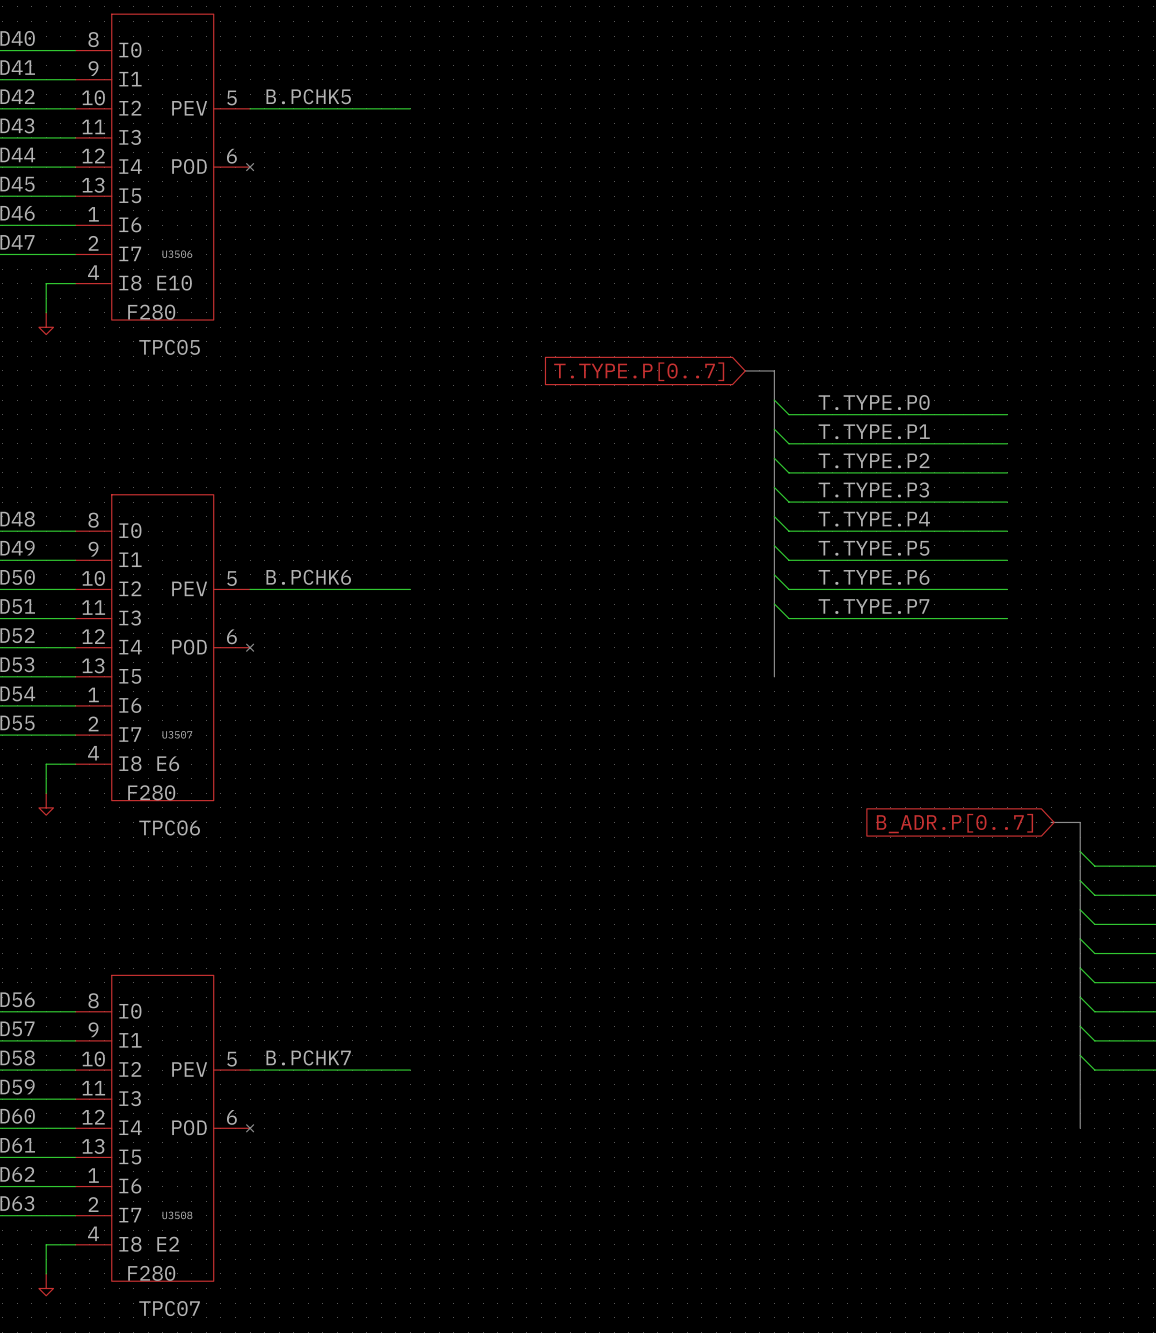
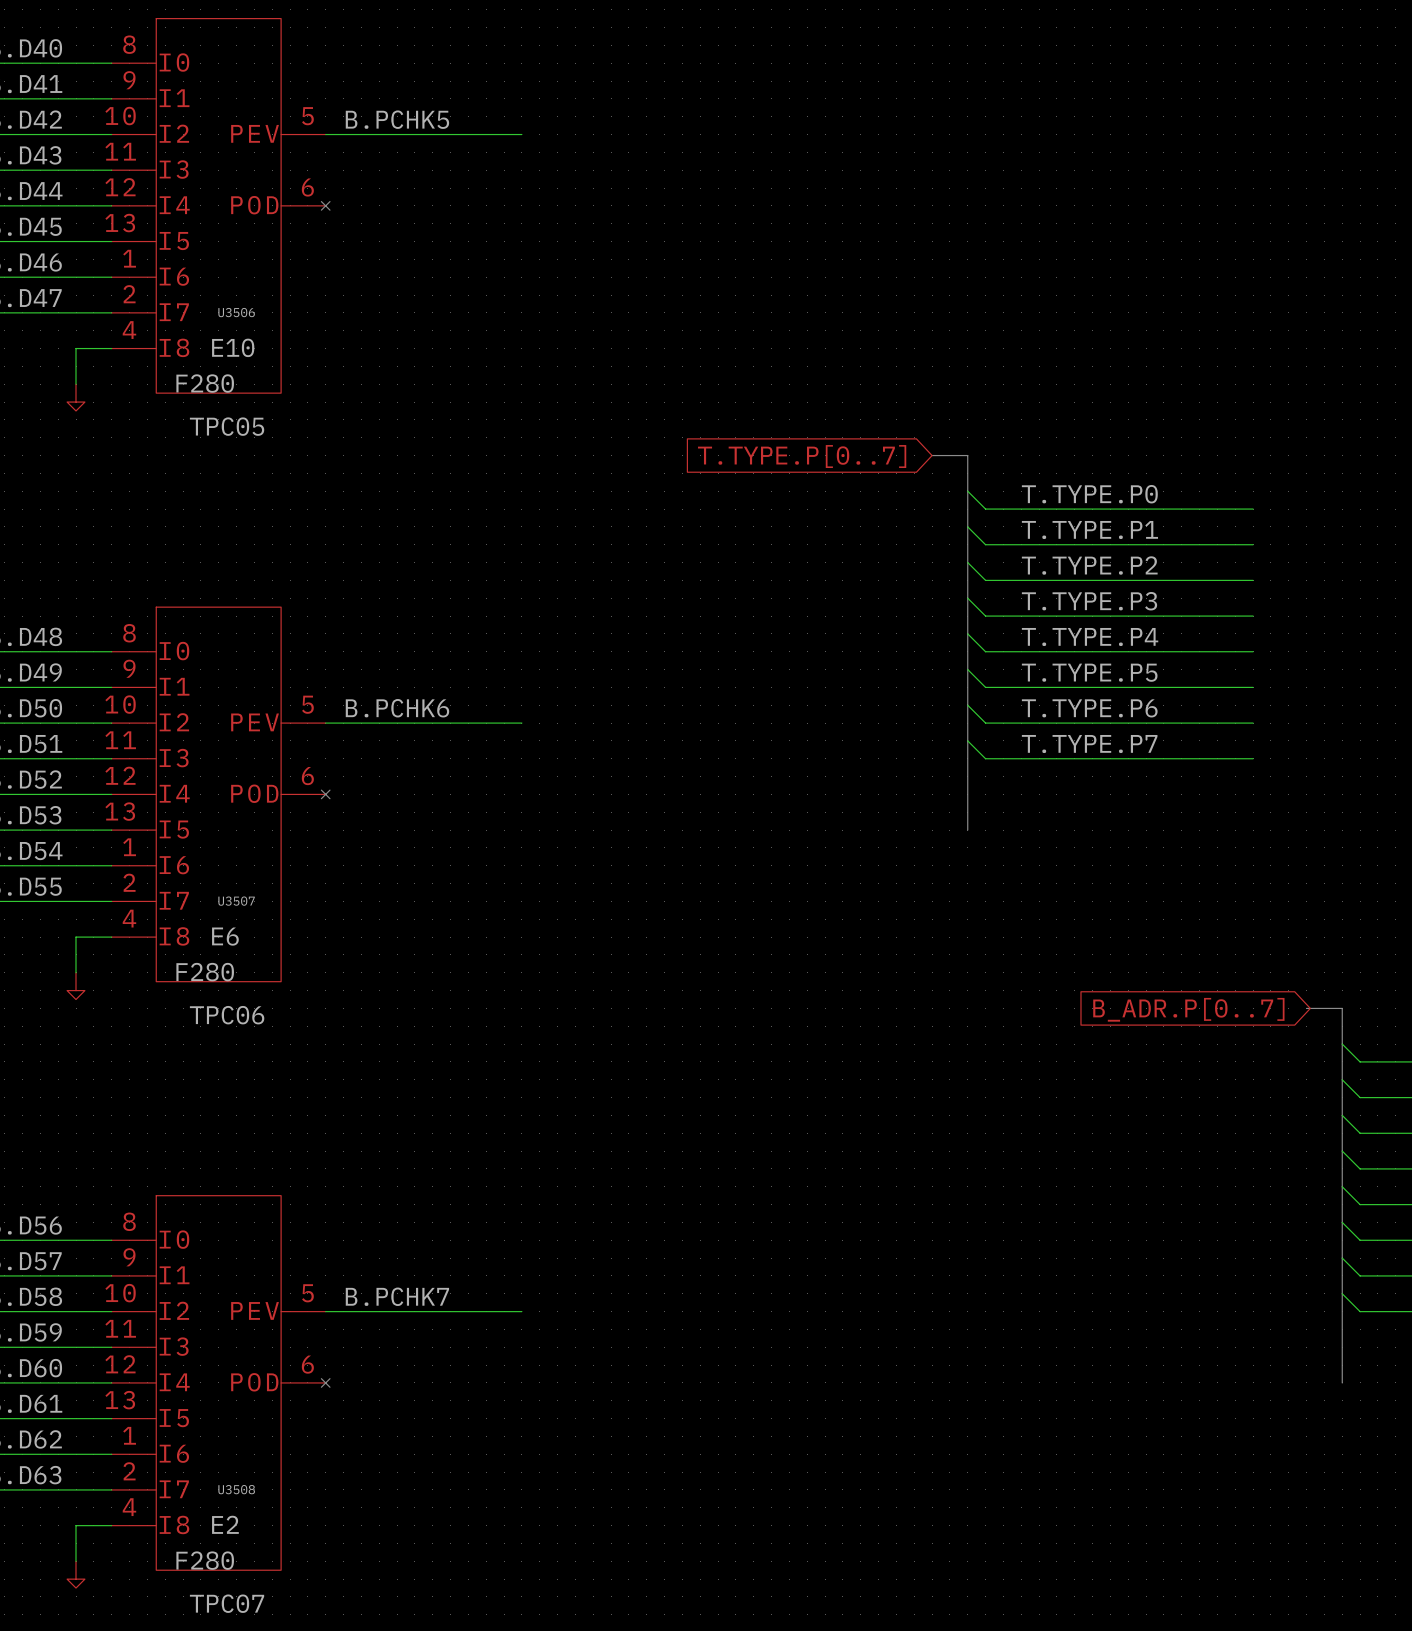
U3506 symbol: [75, 14, 251, 321] -> [111, 18, 326, 394]
U3507 symbol: [75, 494, 251, 801] -> [111, 607, 326, 982]
U3508 symbol: [75, 975, 251, 1282] -> [111, 1195, 326, 1571]

